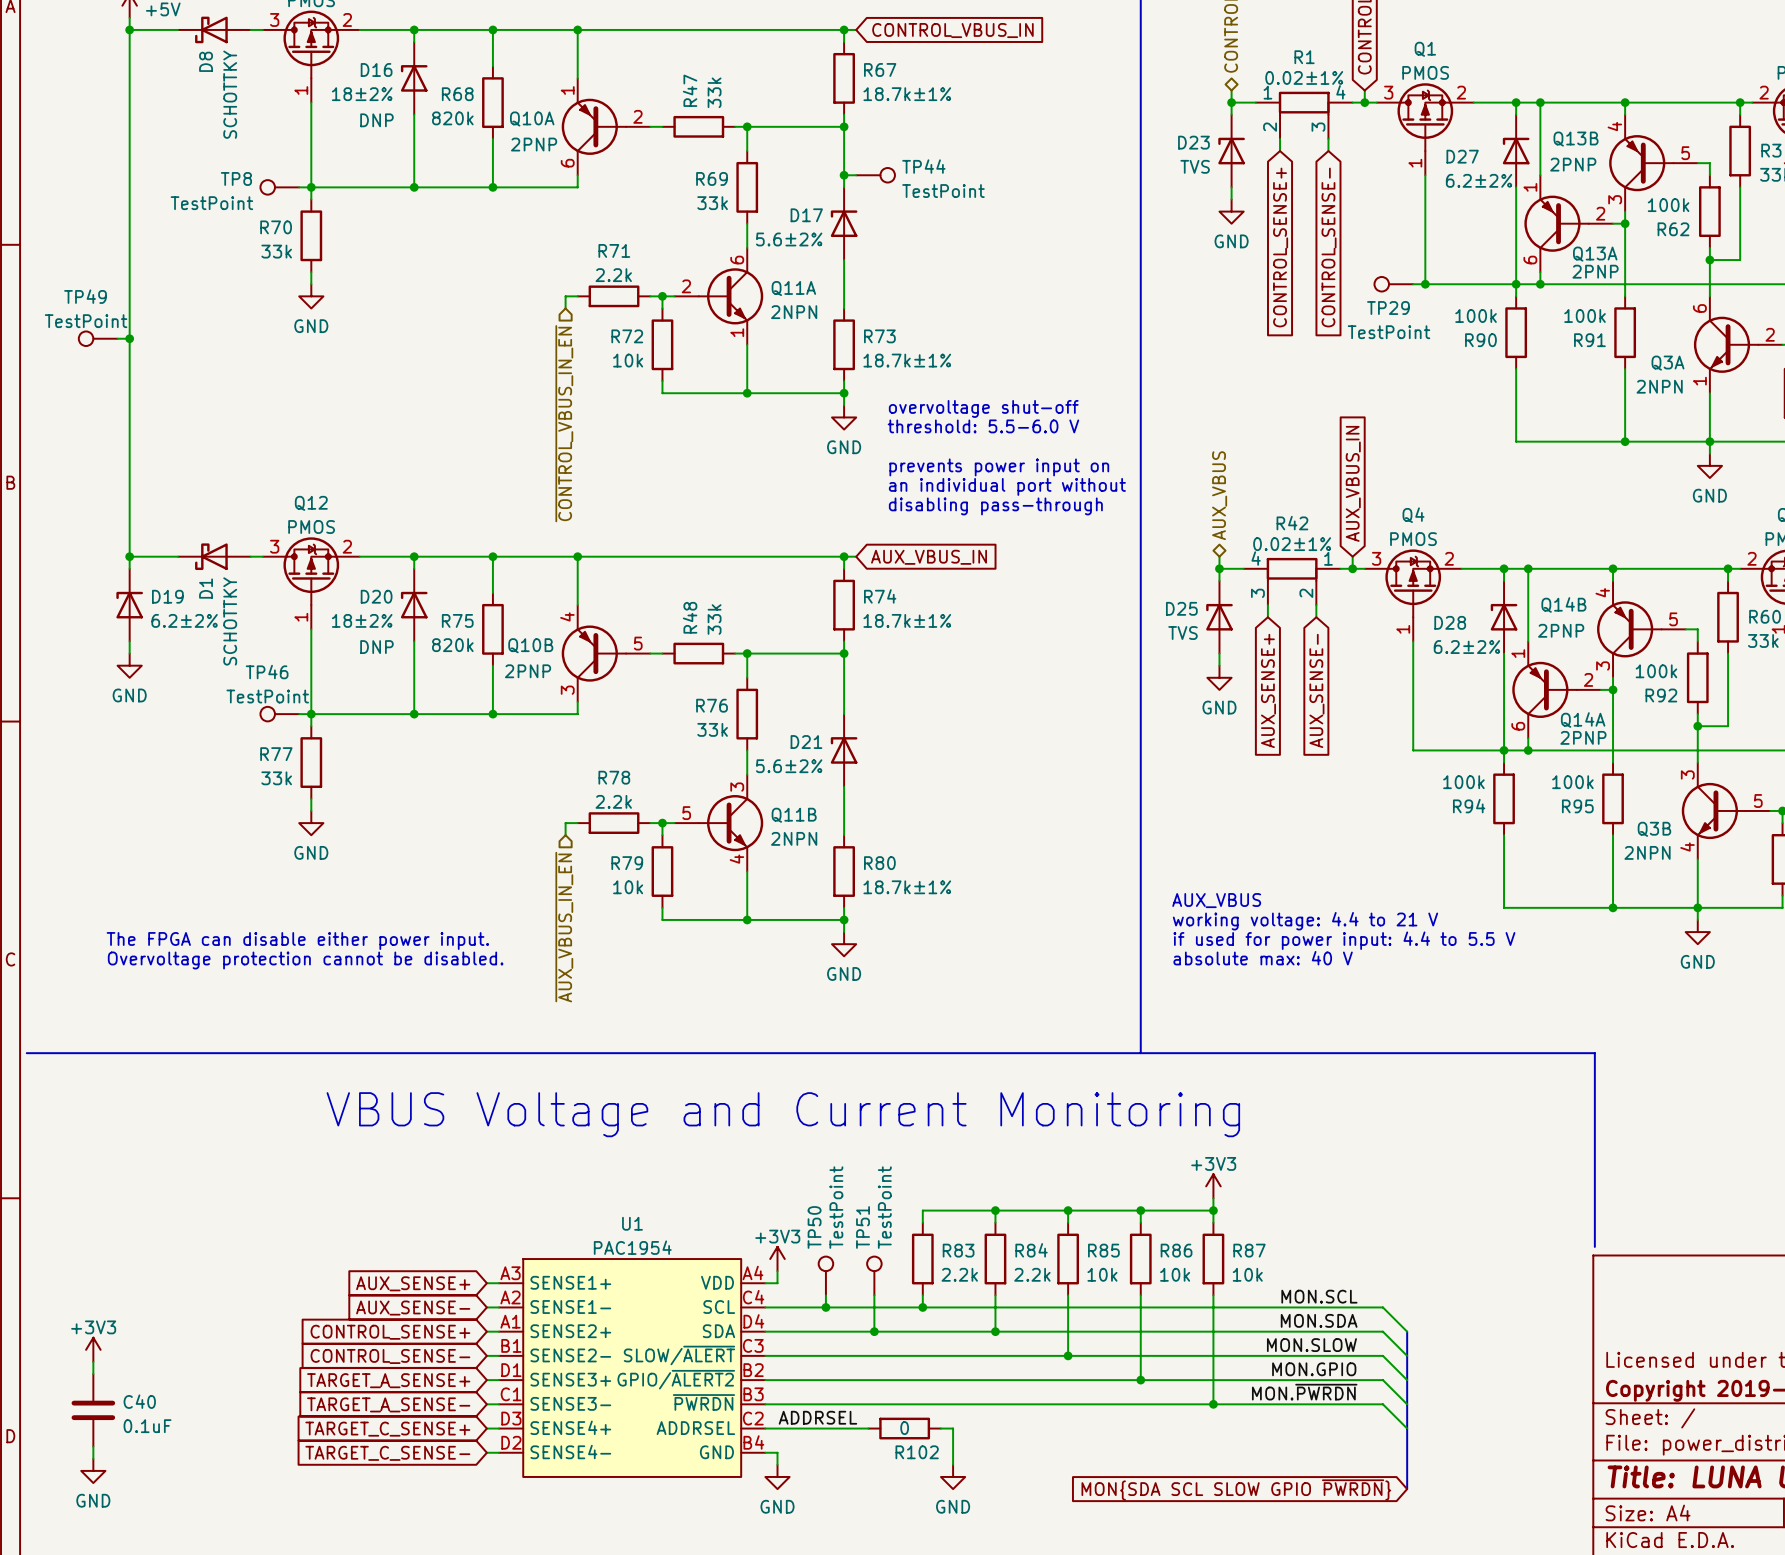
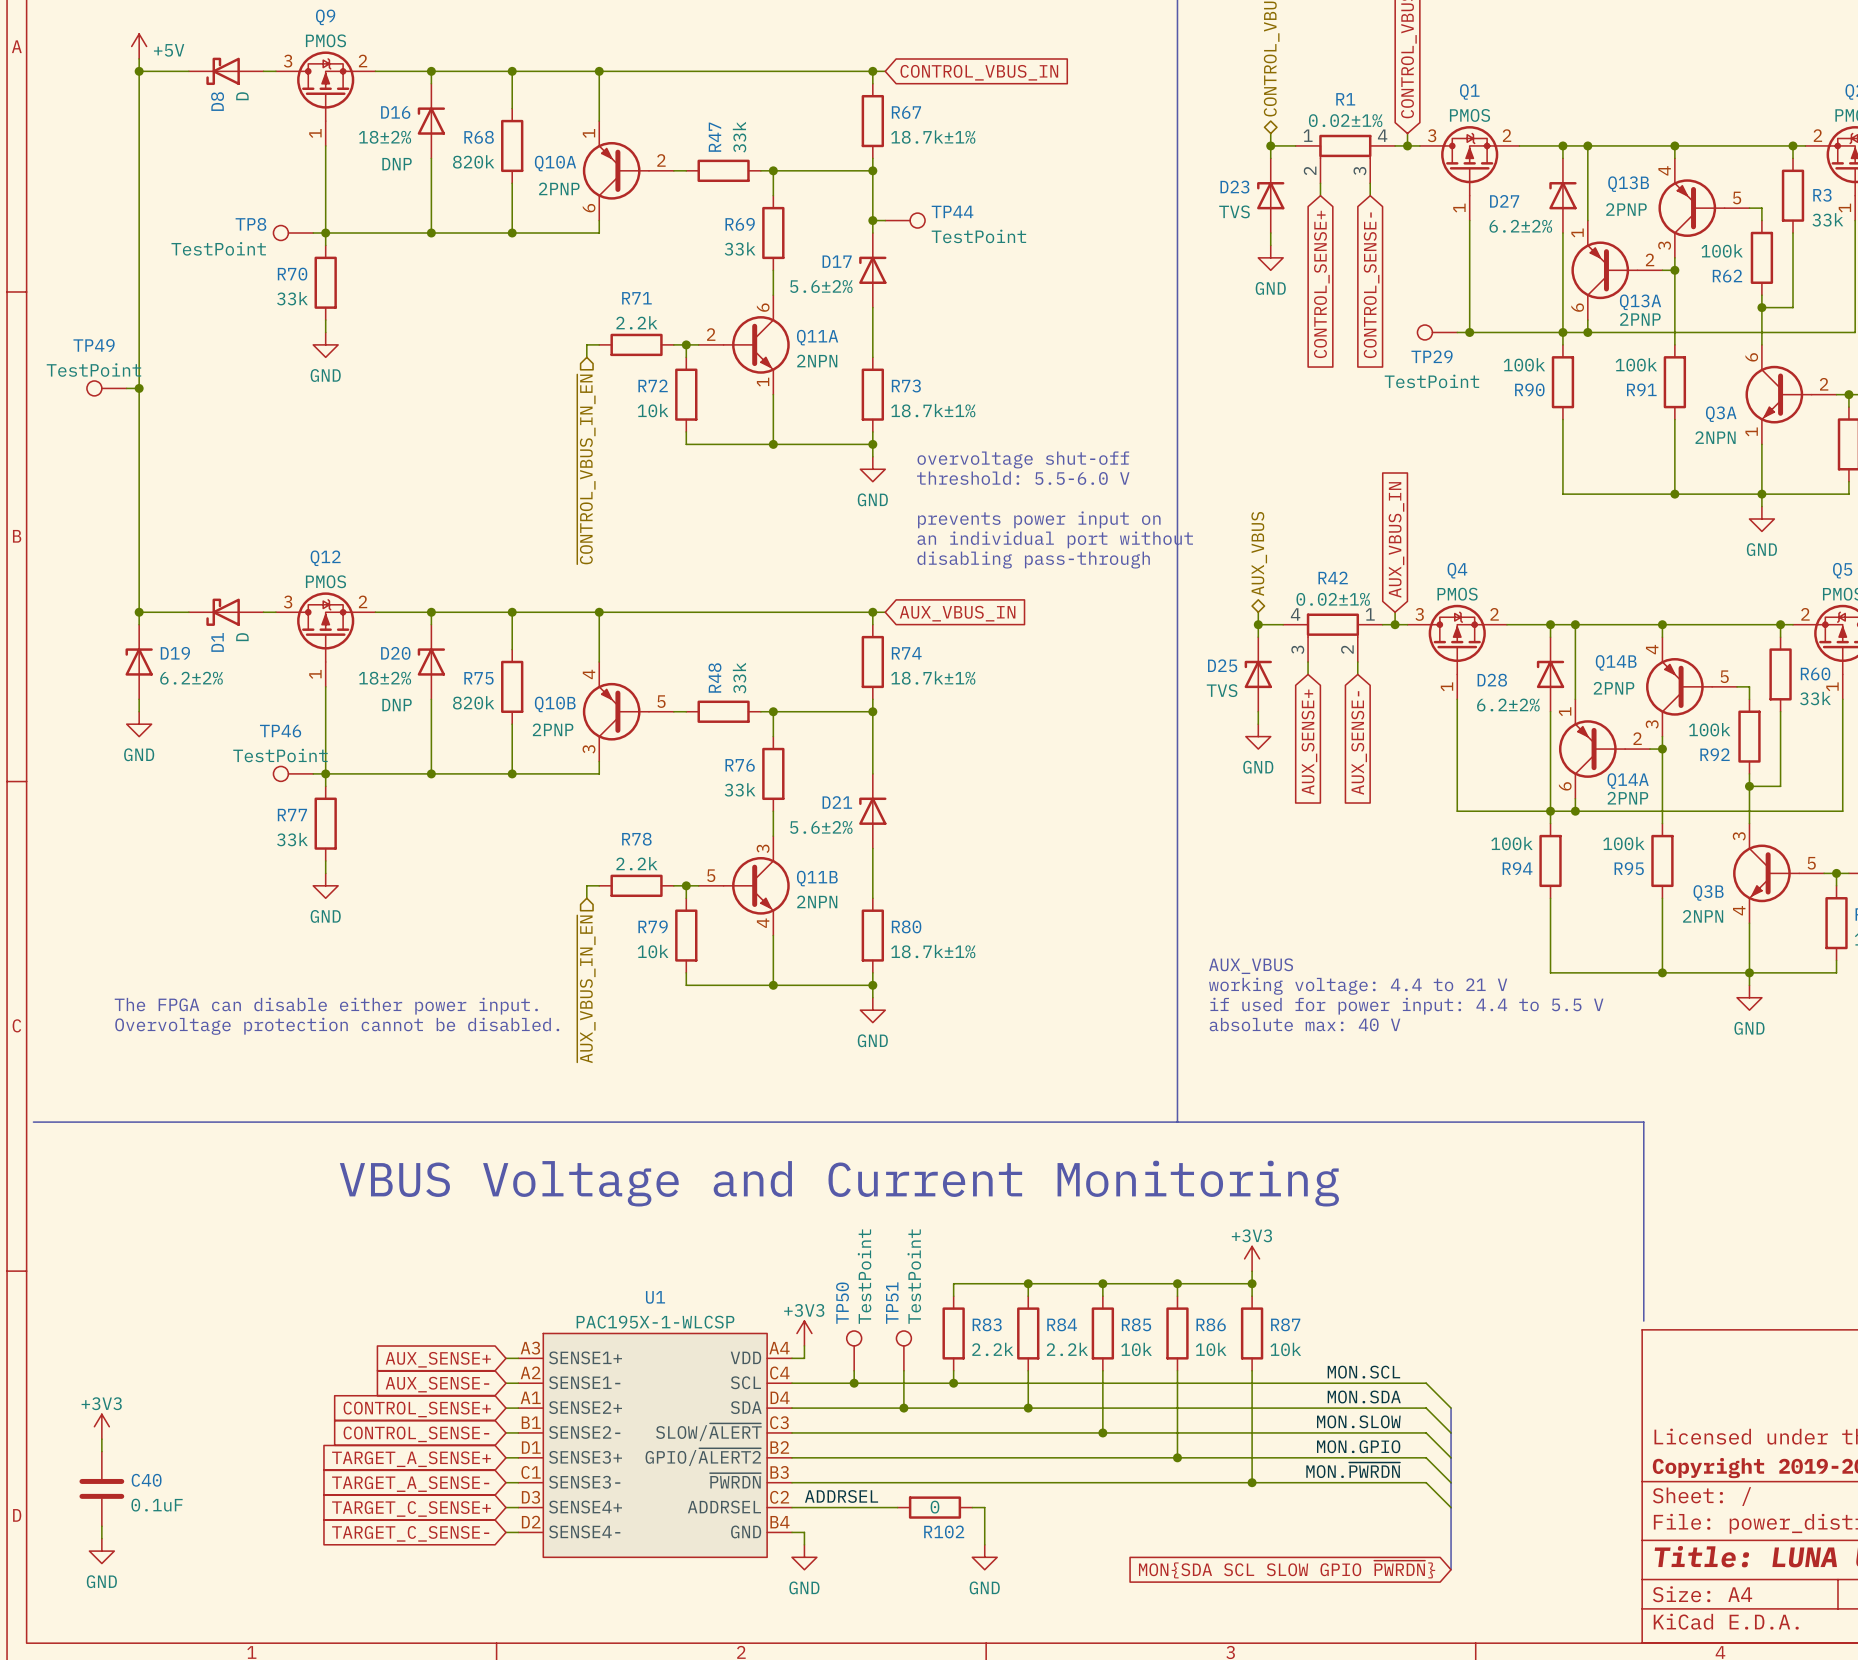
D8 value: SCHOTTKY (230, 94) -> D (242, 96)
D1 value: SCHOTTKY (230, 621) -> D (242, 637)
U1 value: PAC1954 (632, 1247) -> PAC195X-1-WLCSP (655, 1322)

